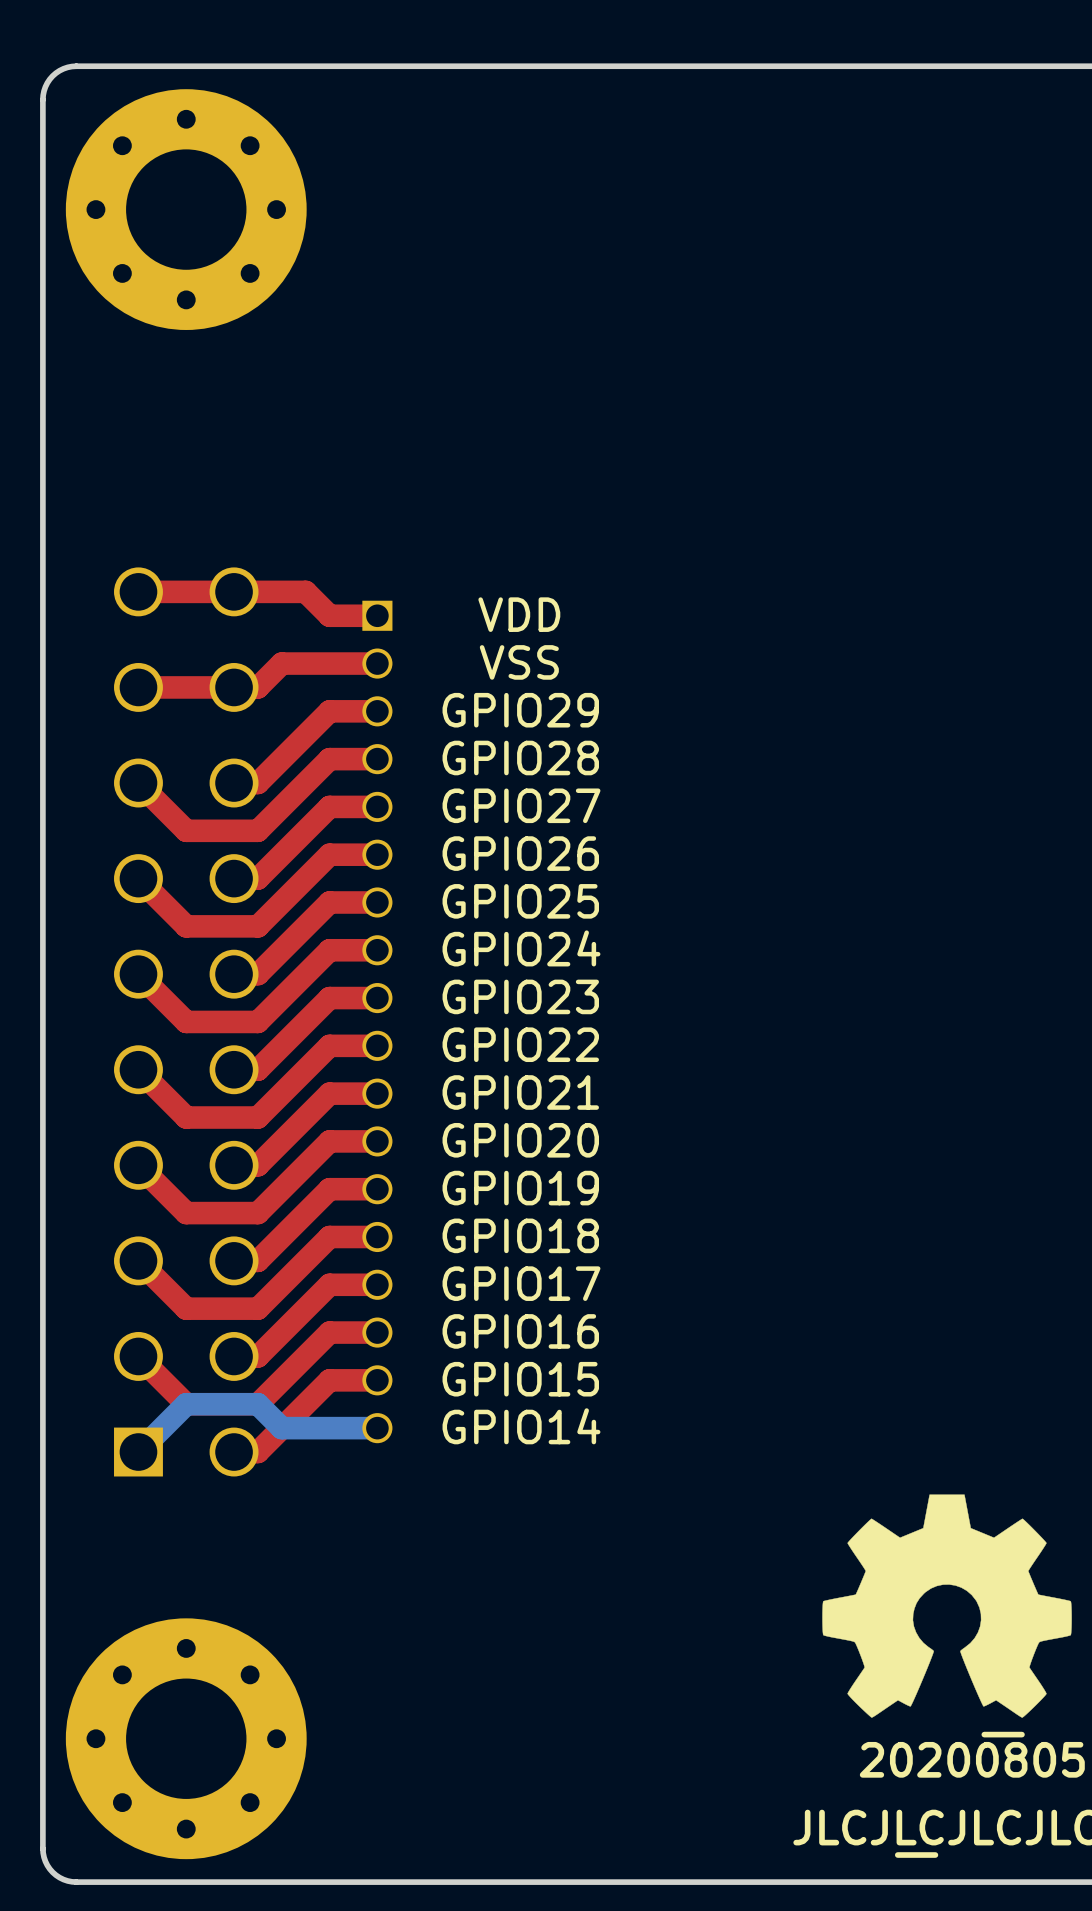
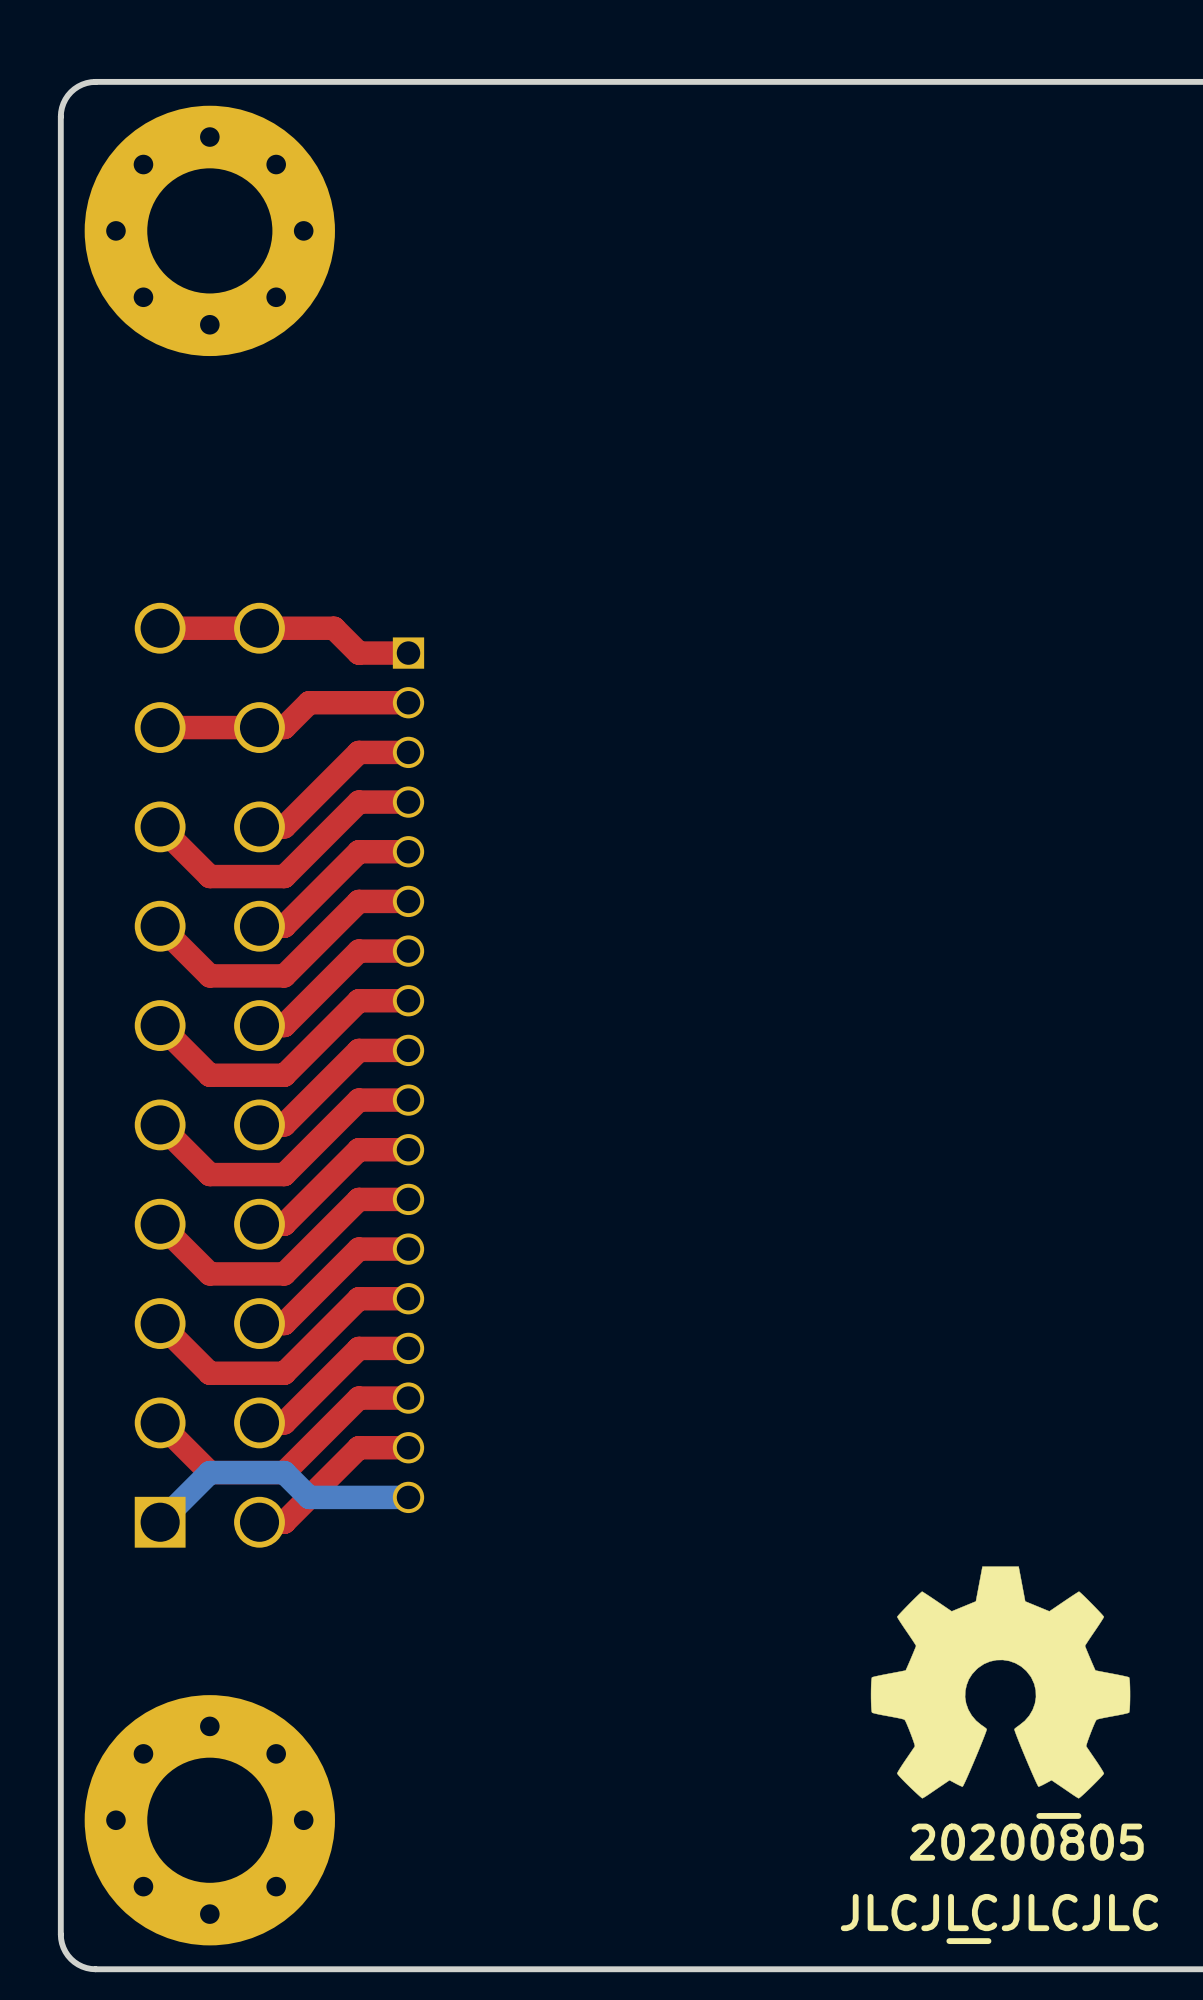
text: VDD (519, 614) -> none
text: VSS (519, 662) -> none
text: GPIO29 (520, 710) -> none
text: GPIO28 (520, 758) -> none
text: GPIO27 (521, 805) -> none
text: GPIO26 (520, 853) -> none
text: GPIO25 (520, 901) -> none
text: GPIO24 (521, 948) -> none
text: GPIO23 (520, 996) -> none
text: GPIO22 (520, 1044) -> none
text: GPIO21 (520, 1092) -> none
text: GPIO20 (520, 1140) -> none
text: GPIO19 (520, 1188) -> none
text: GPIO18 (520, 1235) -> none
text: GPIO17 (521, 1283) -> none
text: GPIO16 (520, 1331) -> none
text: GPIO15 (520, 1379) -> none
text: GPIO14 (521, 1426) -> none

